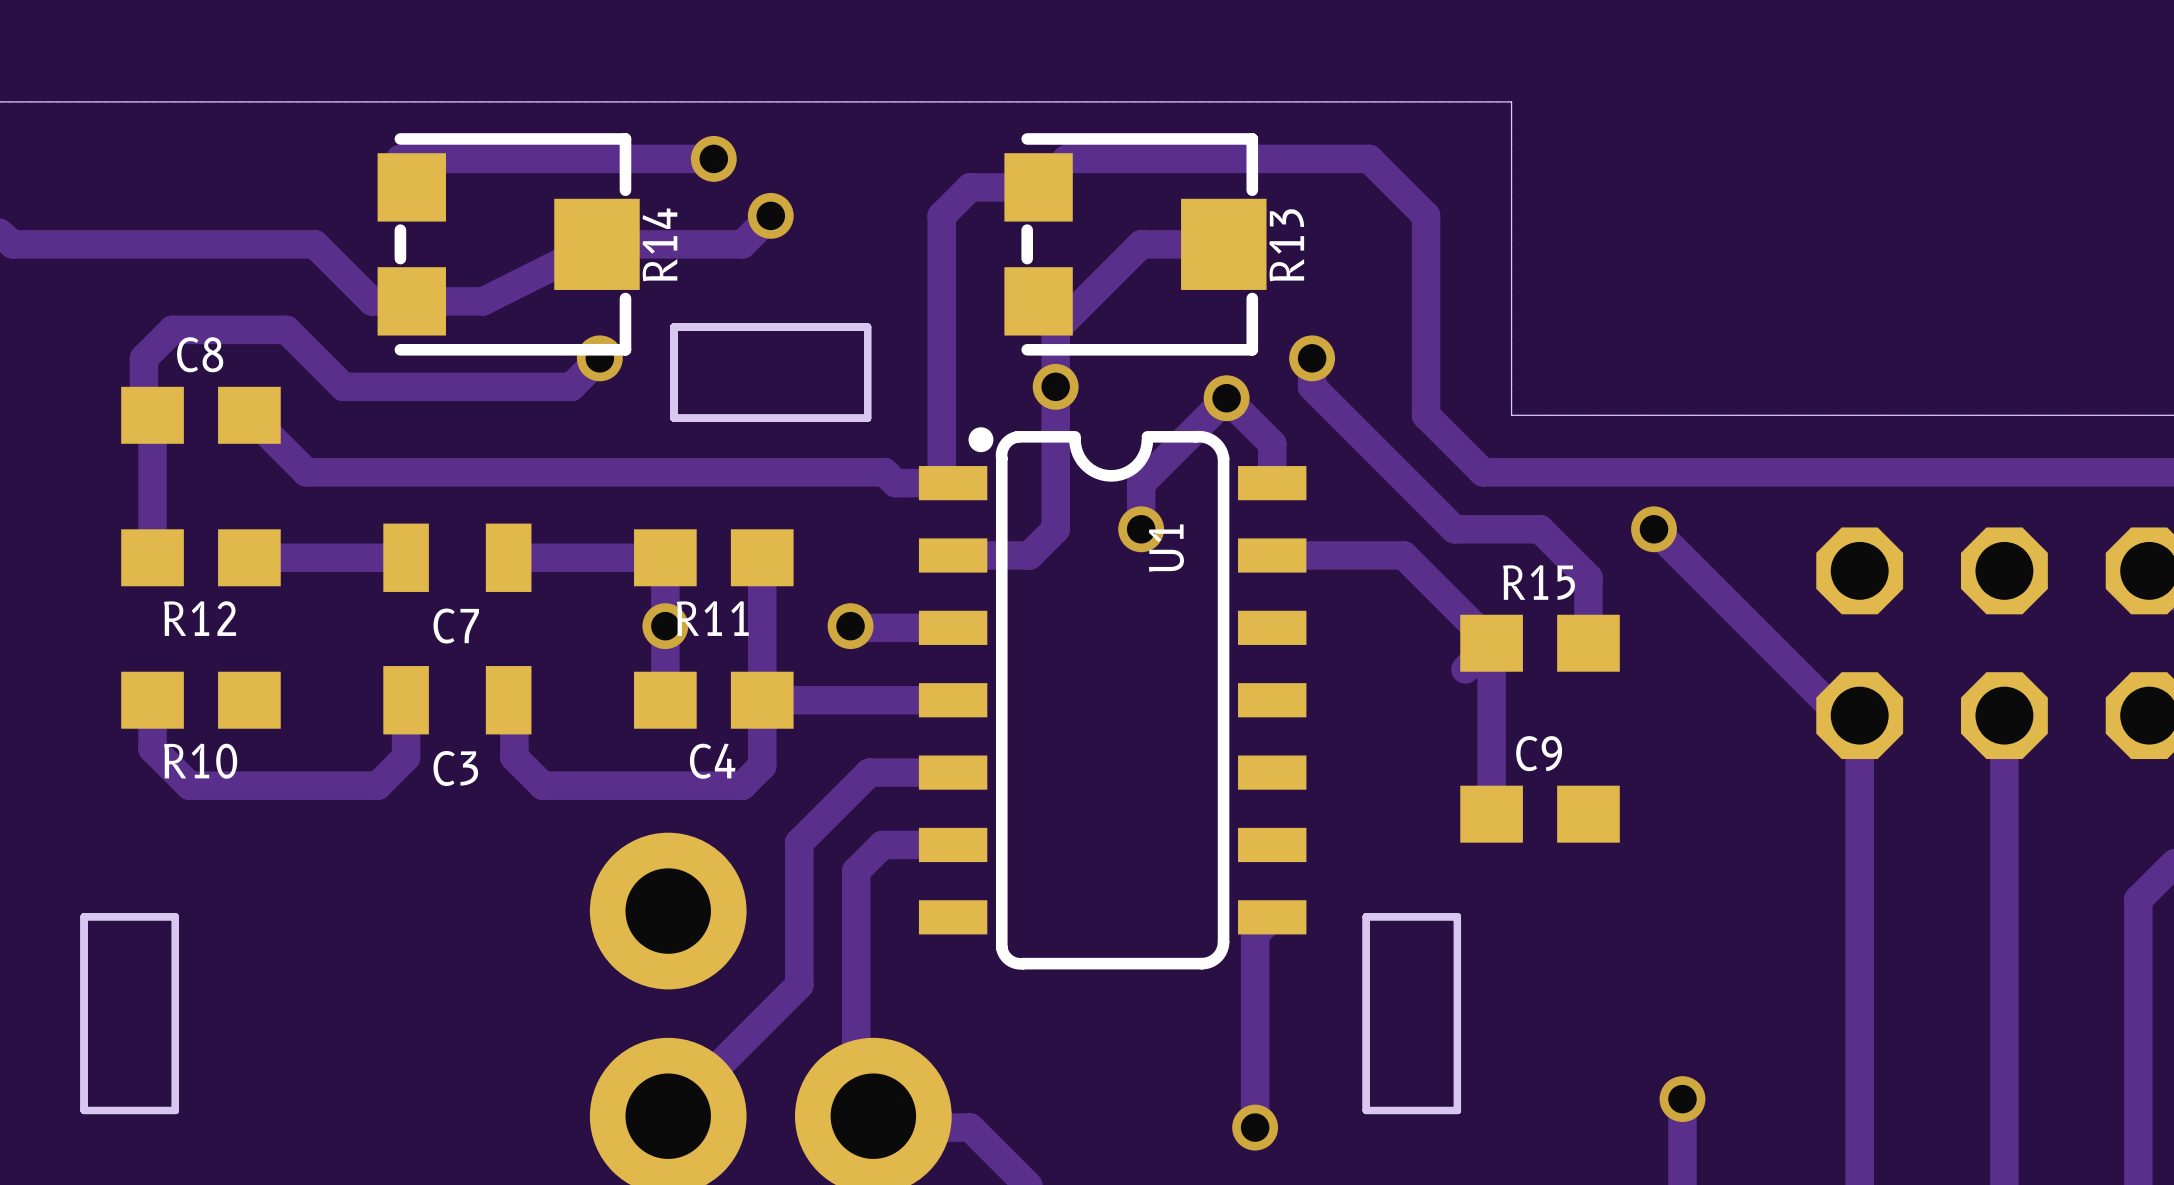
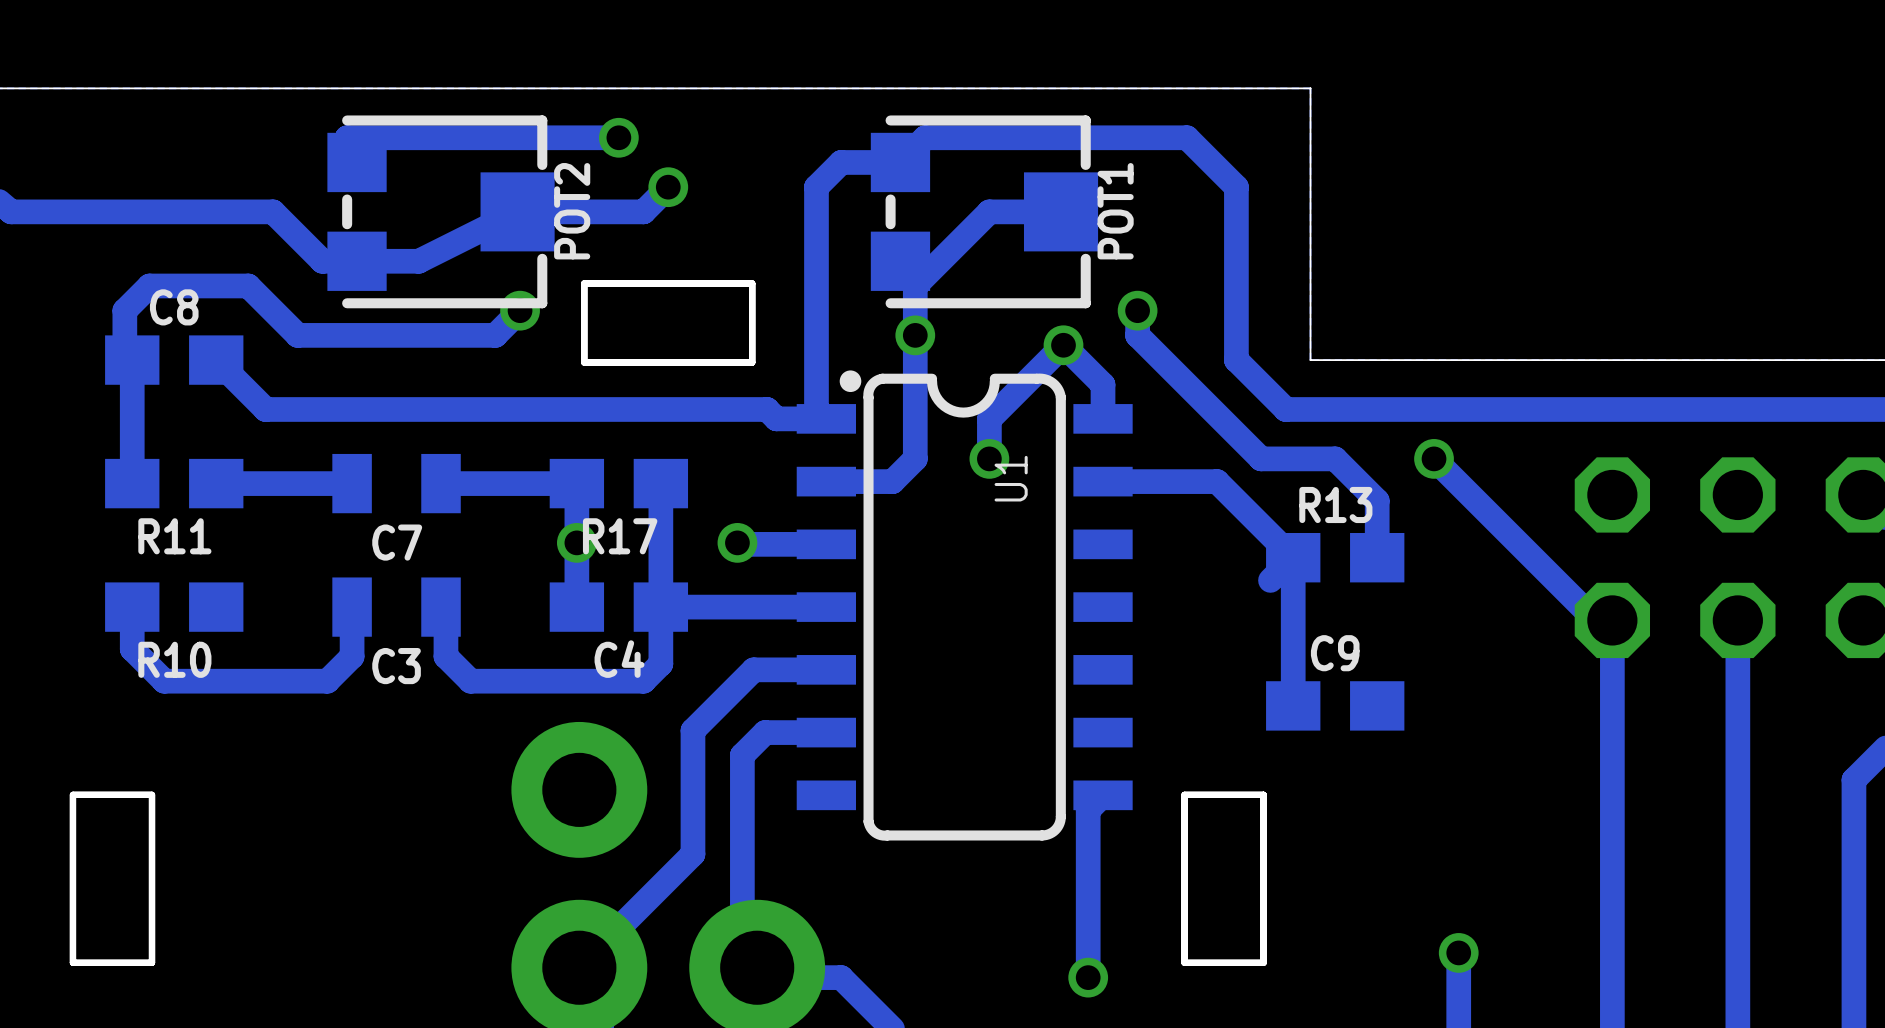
R14 name: R14 (659, 244) -> POT2 (572, 211)
R13 name: R13 (1286, 245) -> POT1 (1115, 211)
R15 name: R15 (1539, 582) -> R13 (1335, 504)
R12 name: R12 (200, 618) -> R11 (174, 536)
R11 name: R11 (712, 618) -> R17 (620, 536)

